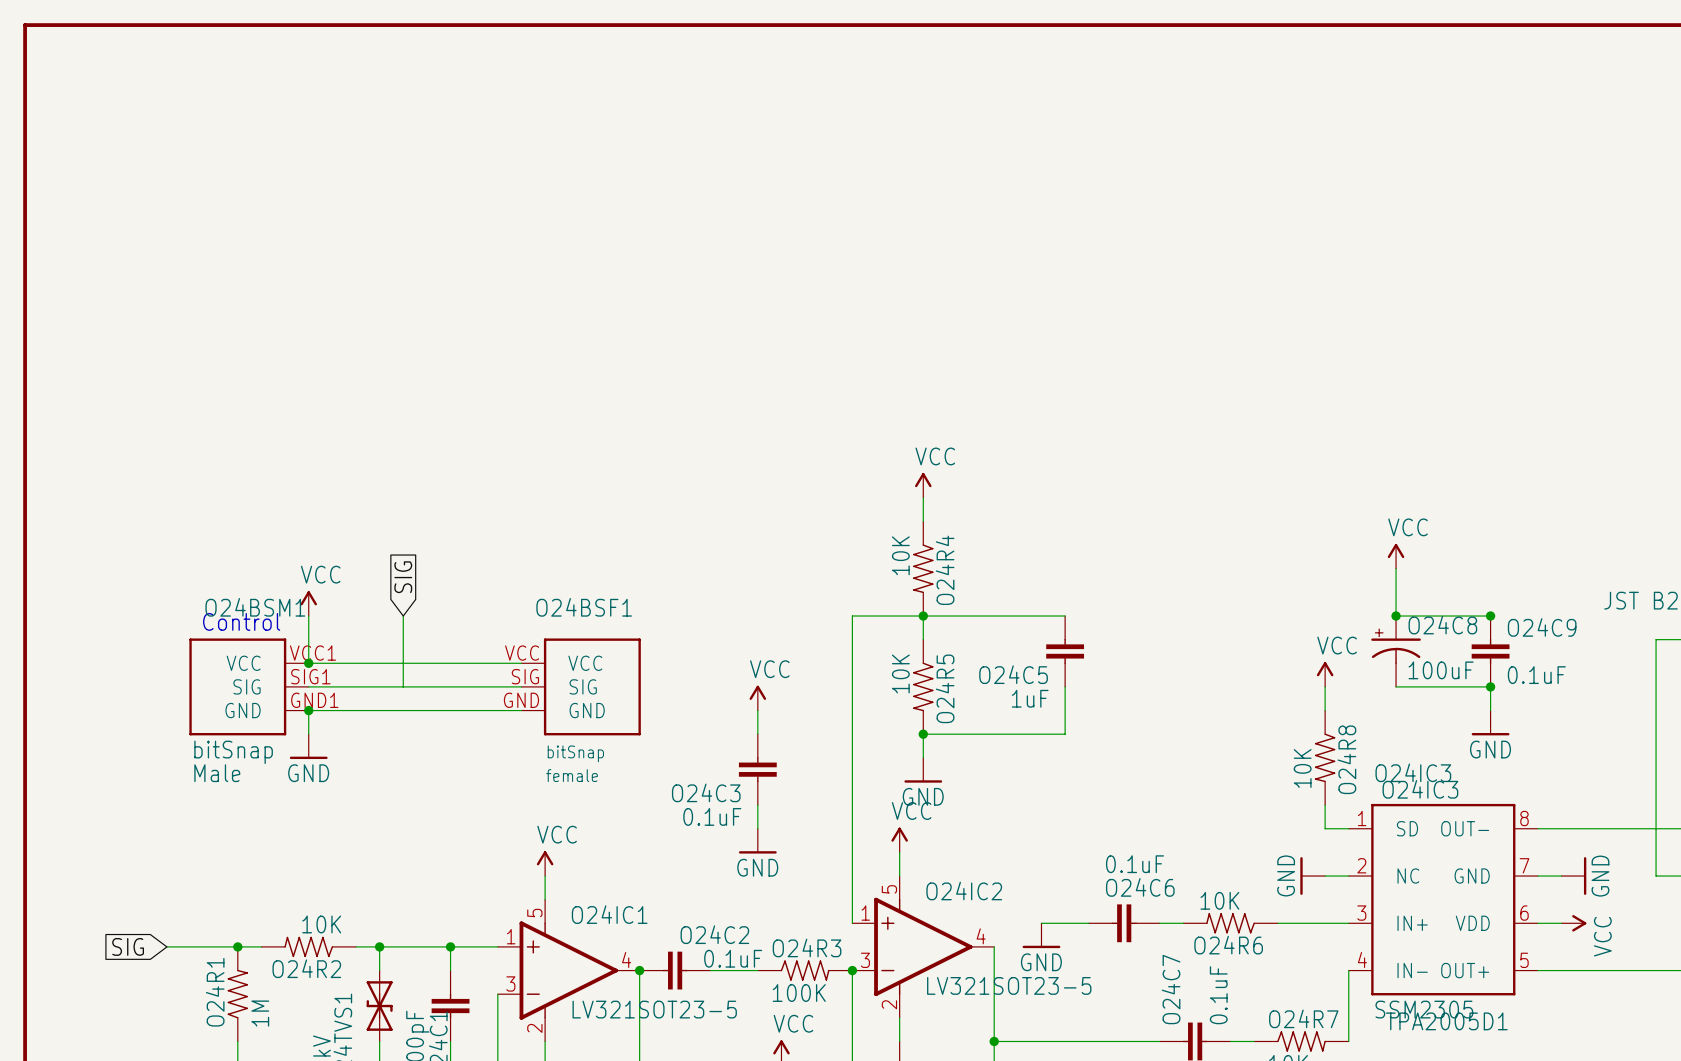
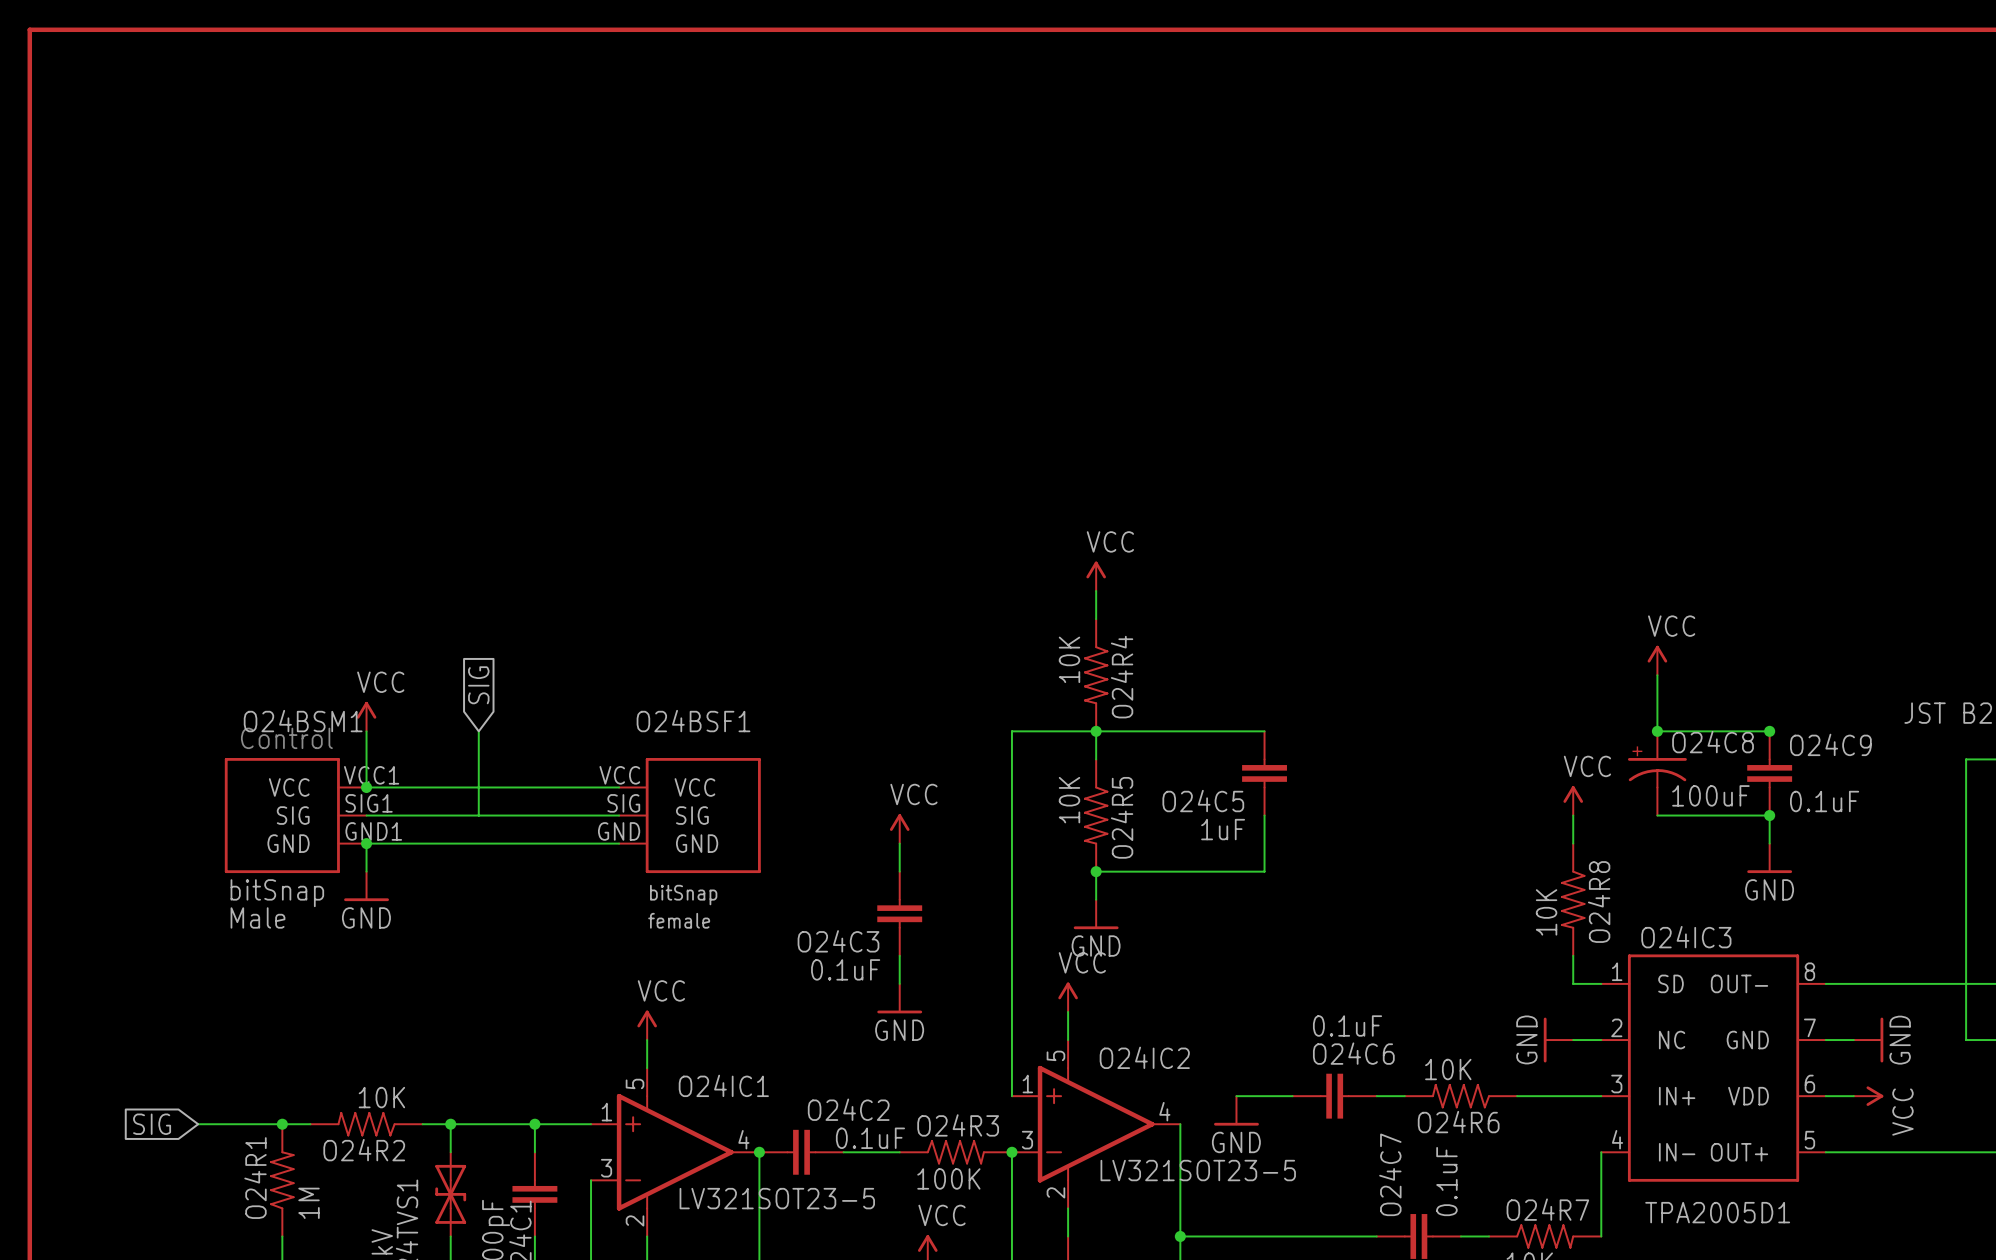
O24IC3 name: O24IC3 (1413, 772) -> none
O24IC3 value: SSM2305 (1424, 1009) -> none

